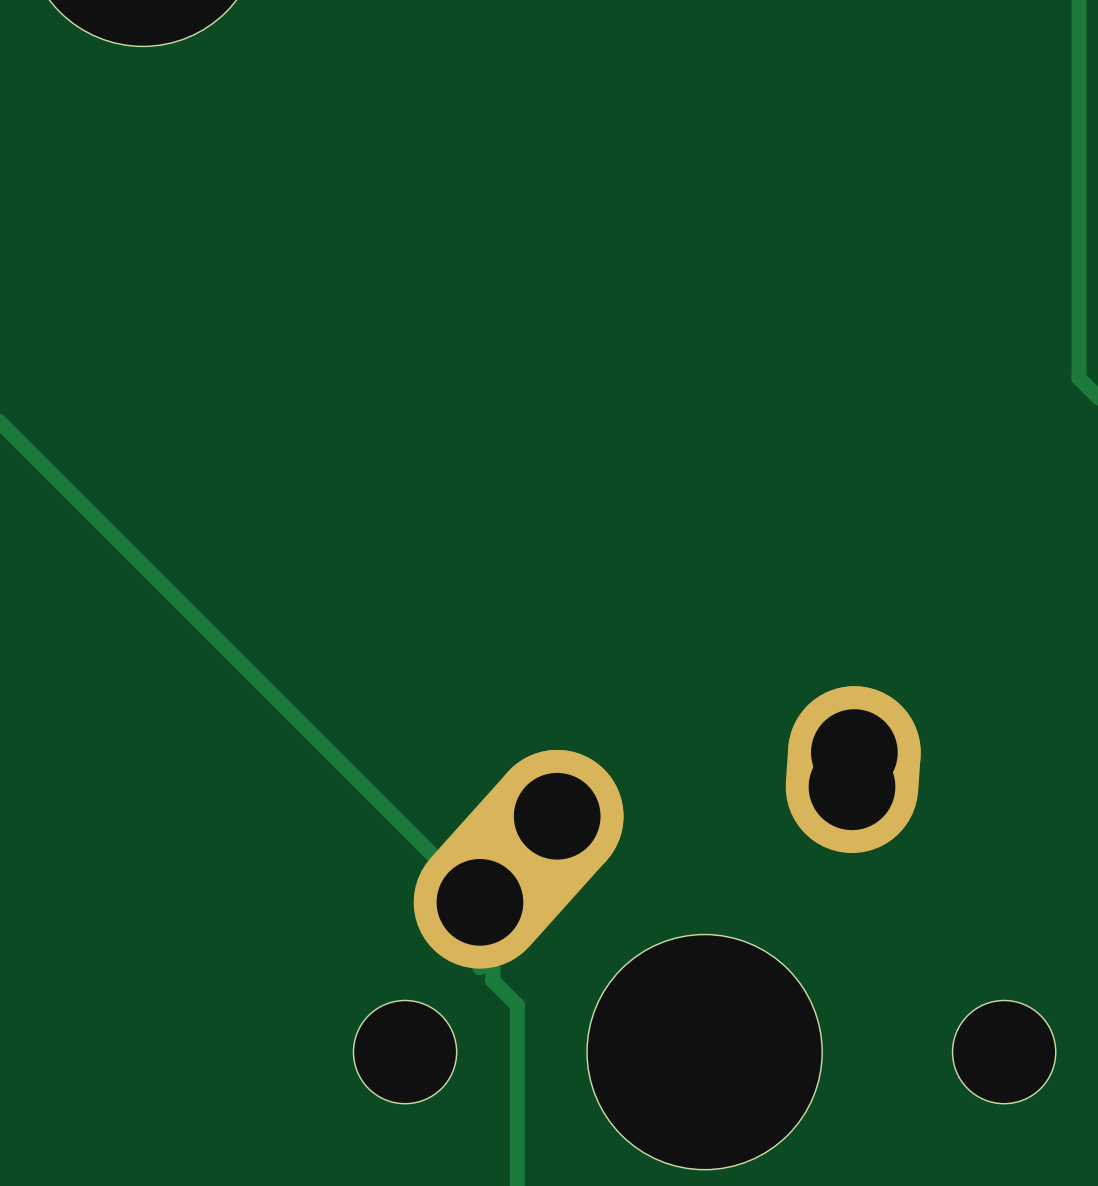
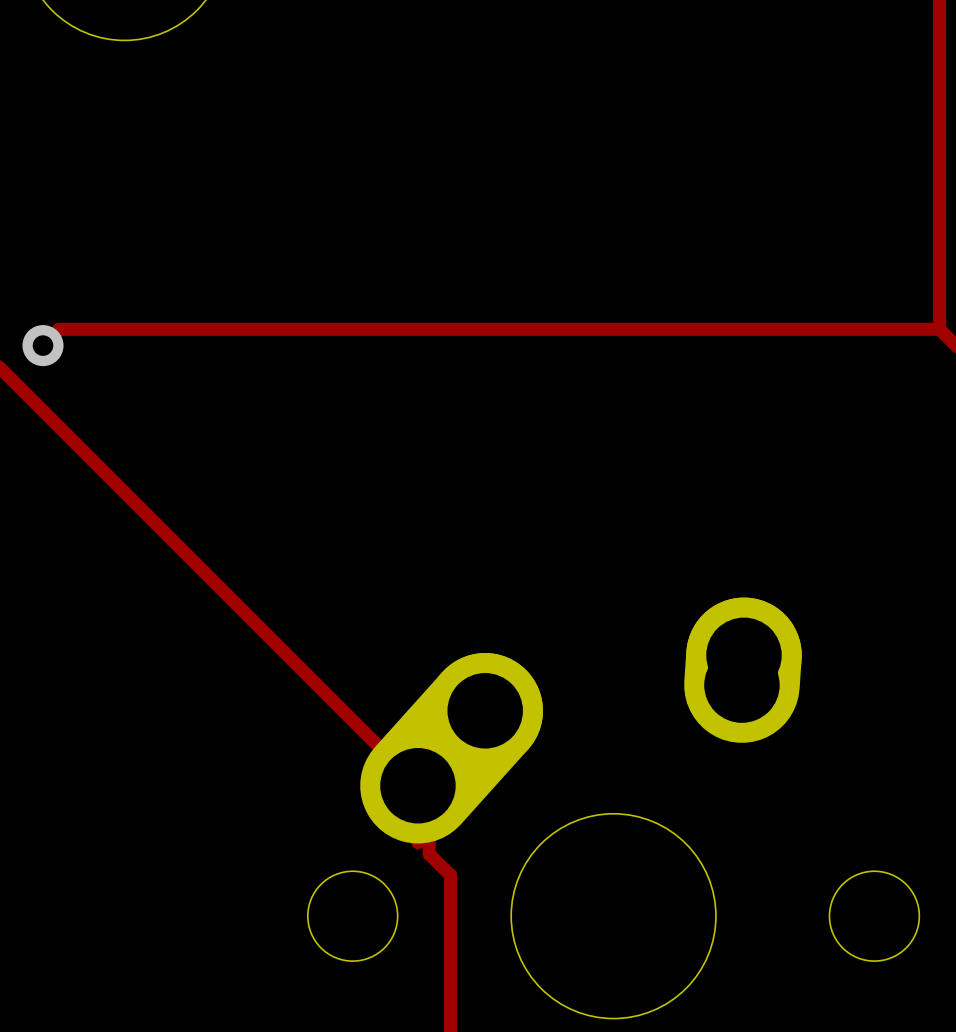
track: none -> (939, 329) (59, 329) (43, 345)
via: none -> (43, 345)

